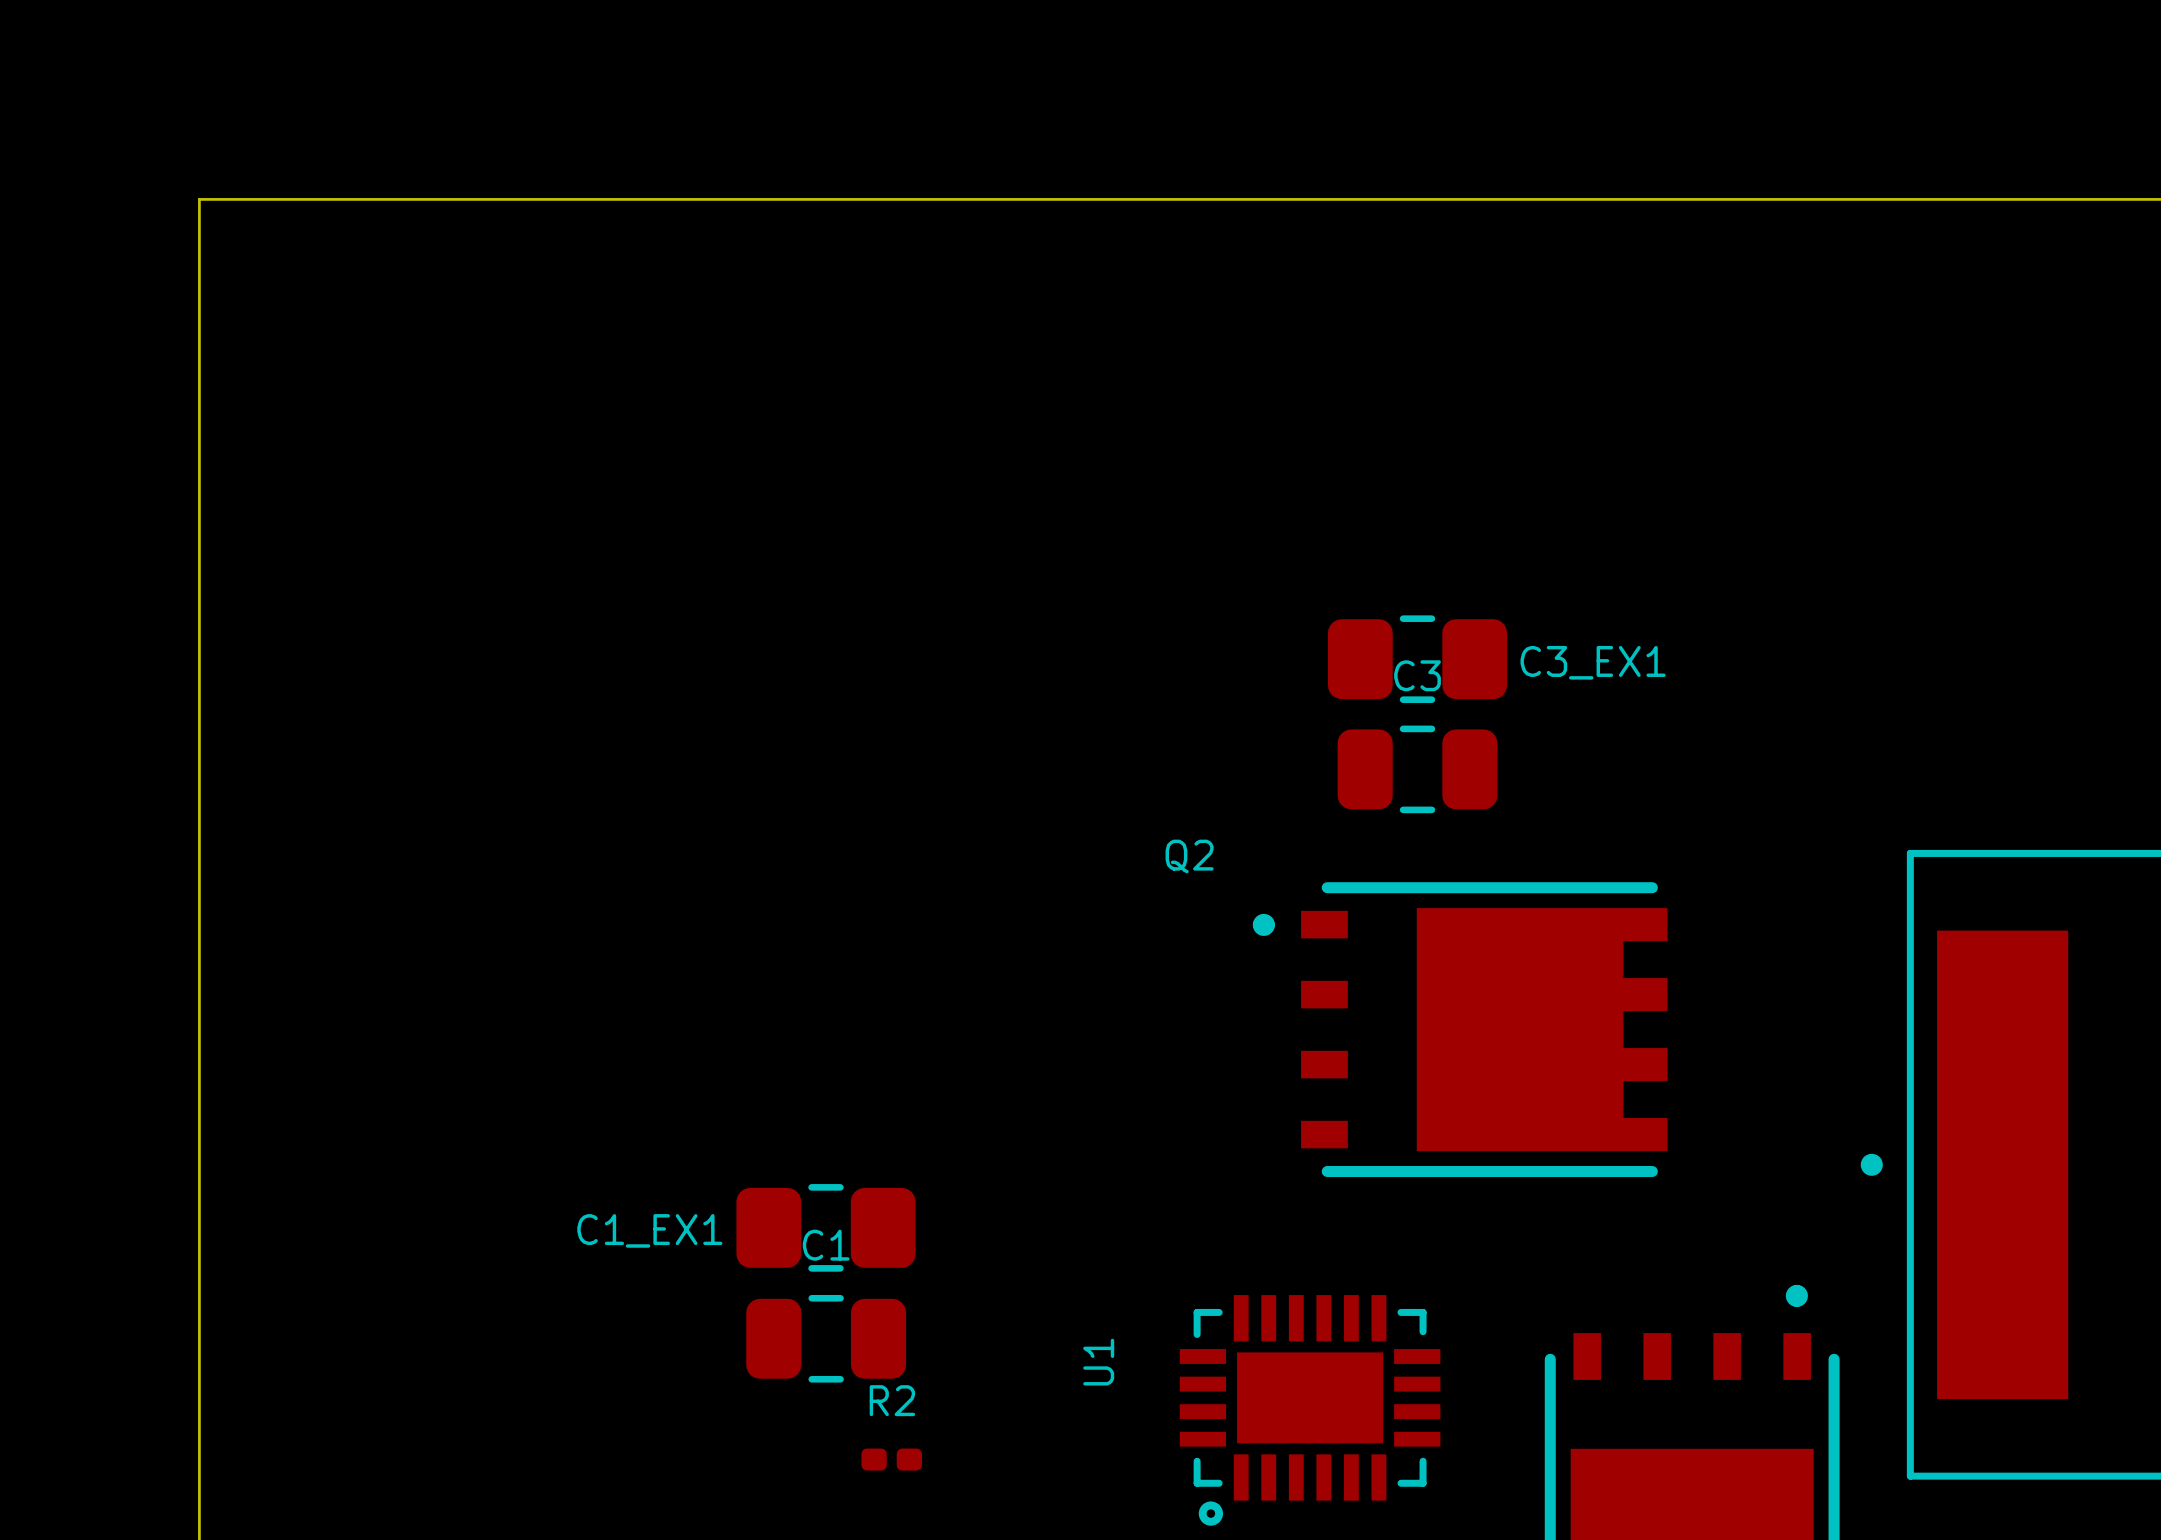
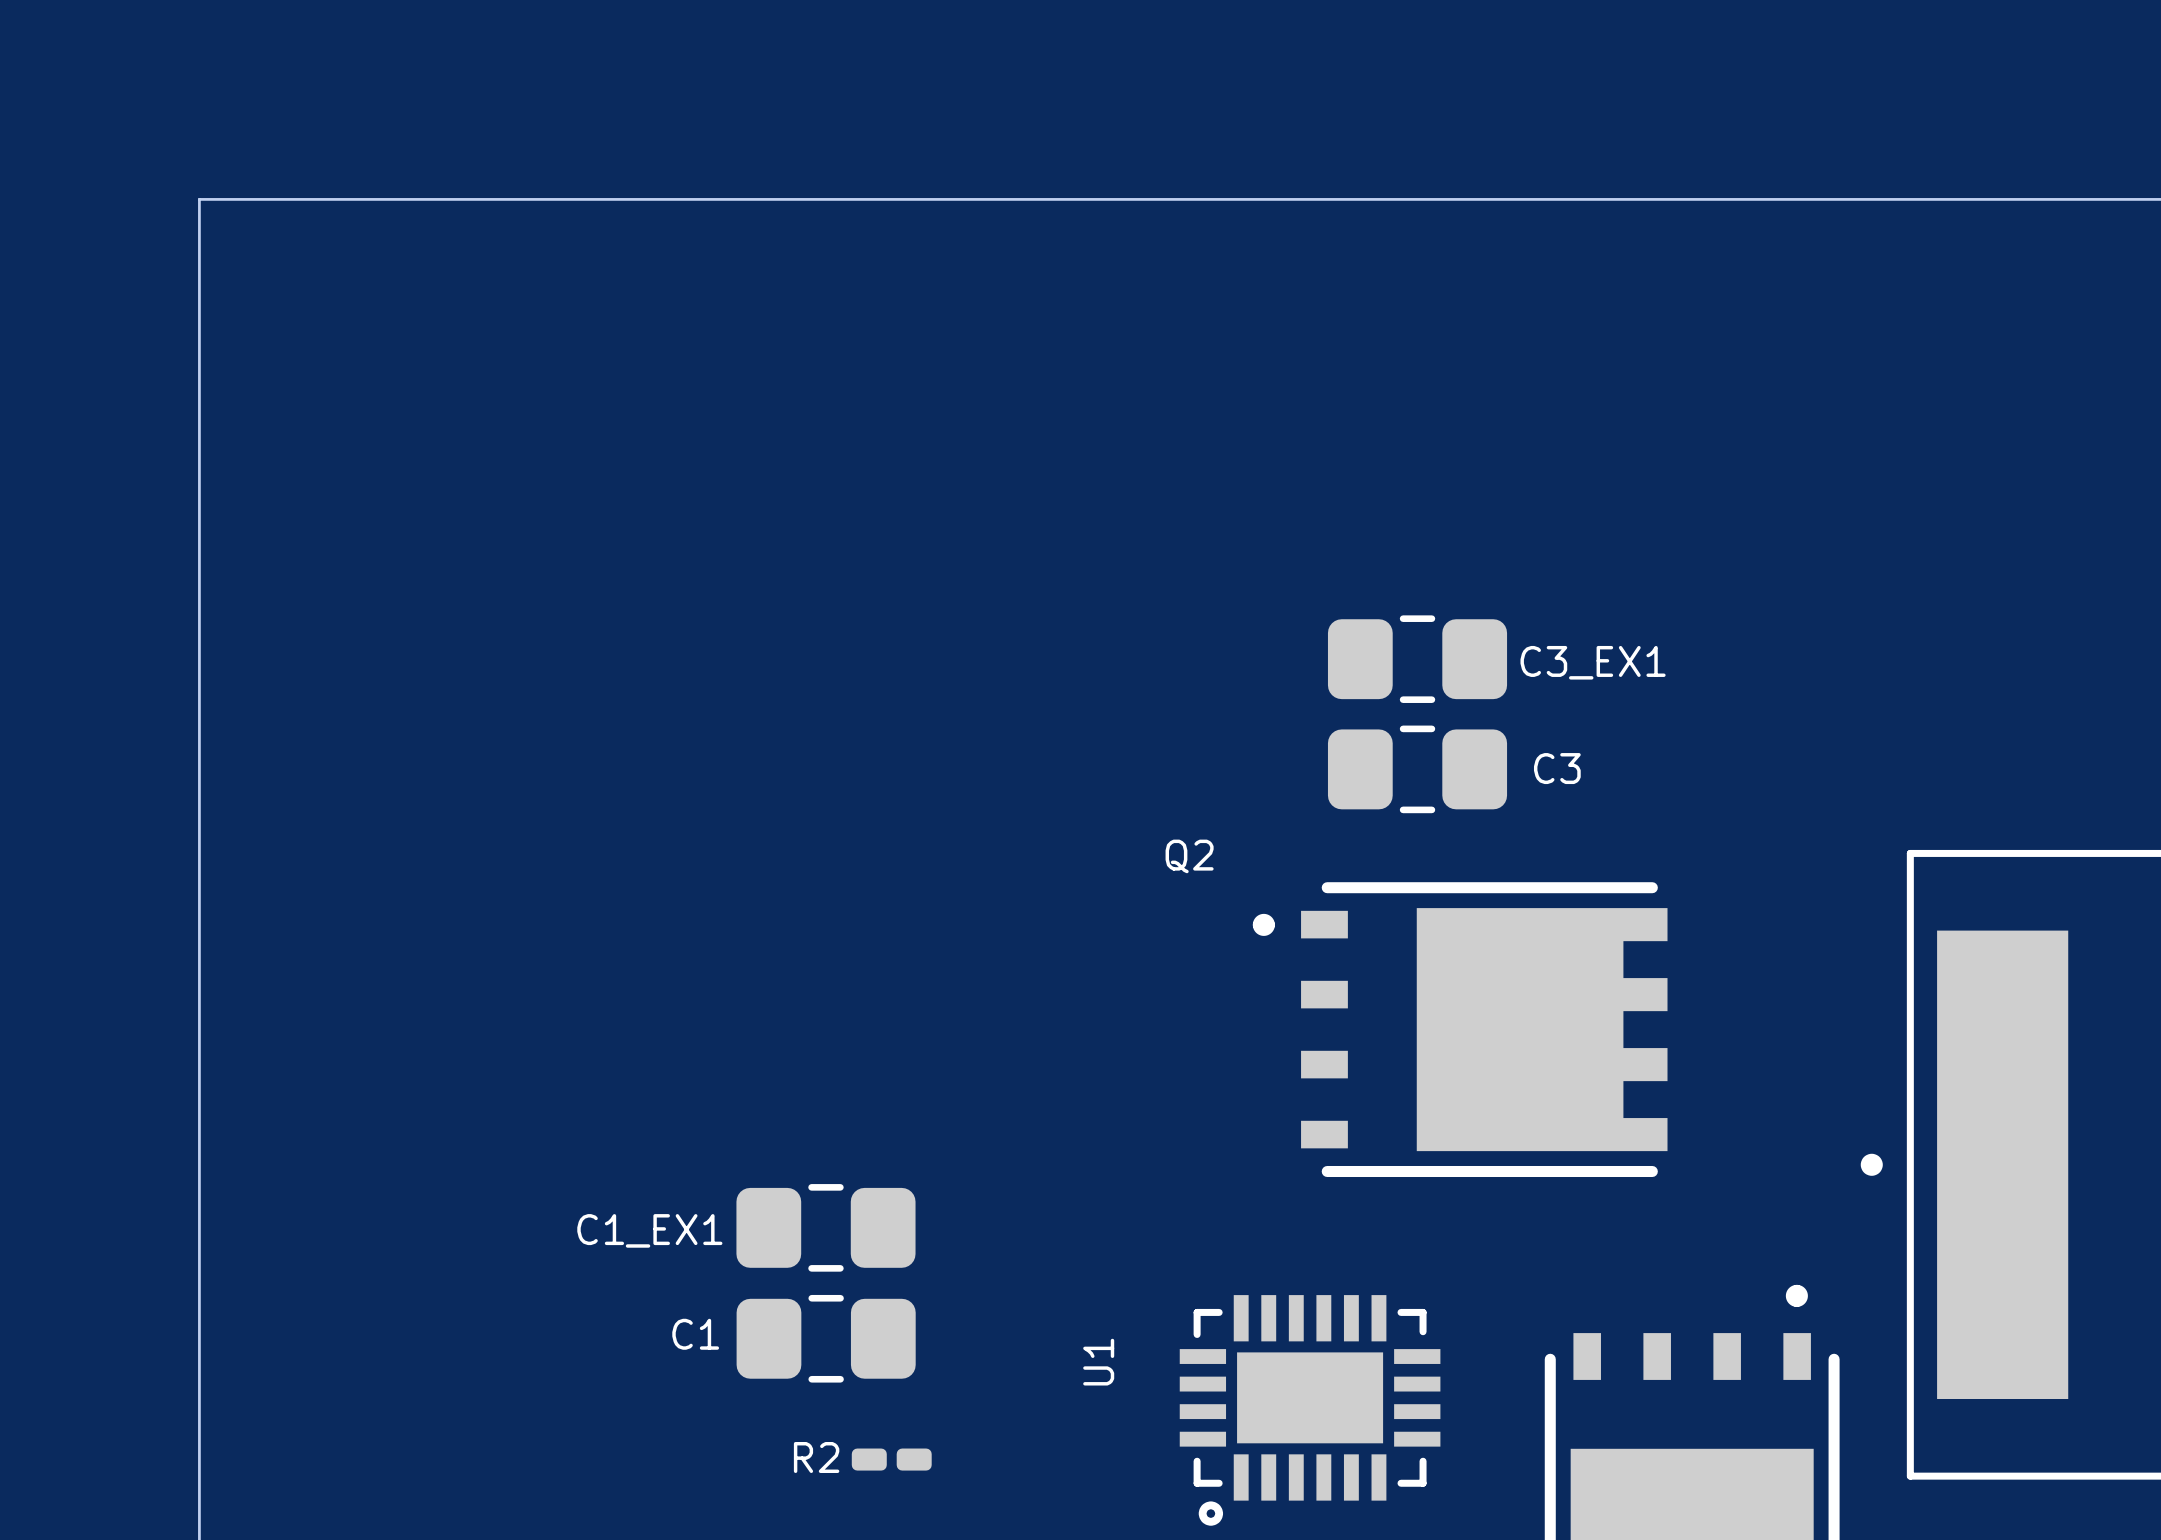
C3 name position: C3 (1417, 675) -> C3 (1557, 768)
C3 footprint: [1337, 725, 1498, 814] -> [1327, 725, 1508, 814]
C1 name position: C1 (826, 1245) -> C1 (695, 1334)
C1 footprint: [746, 1294, 907, 1383] -> [736, 1294, 916, 1383]
R2 name position: R2 (892, 1400) -> R2 (816, 1457)
R2 footprint: [861, 1448, 923, 1471] -> [851, 1448, 932, 1471]

